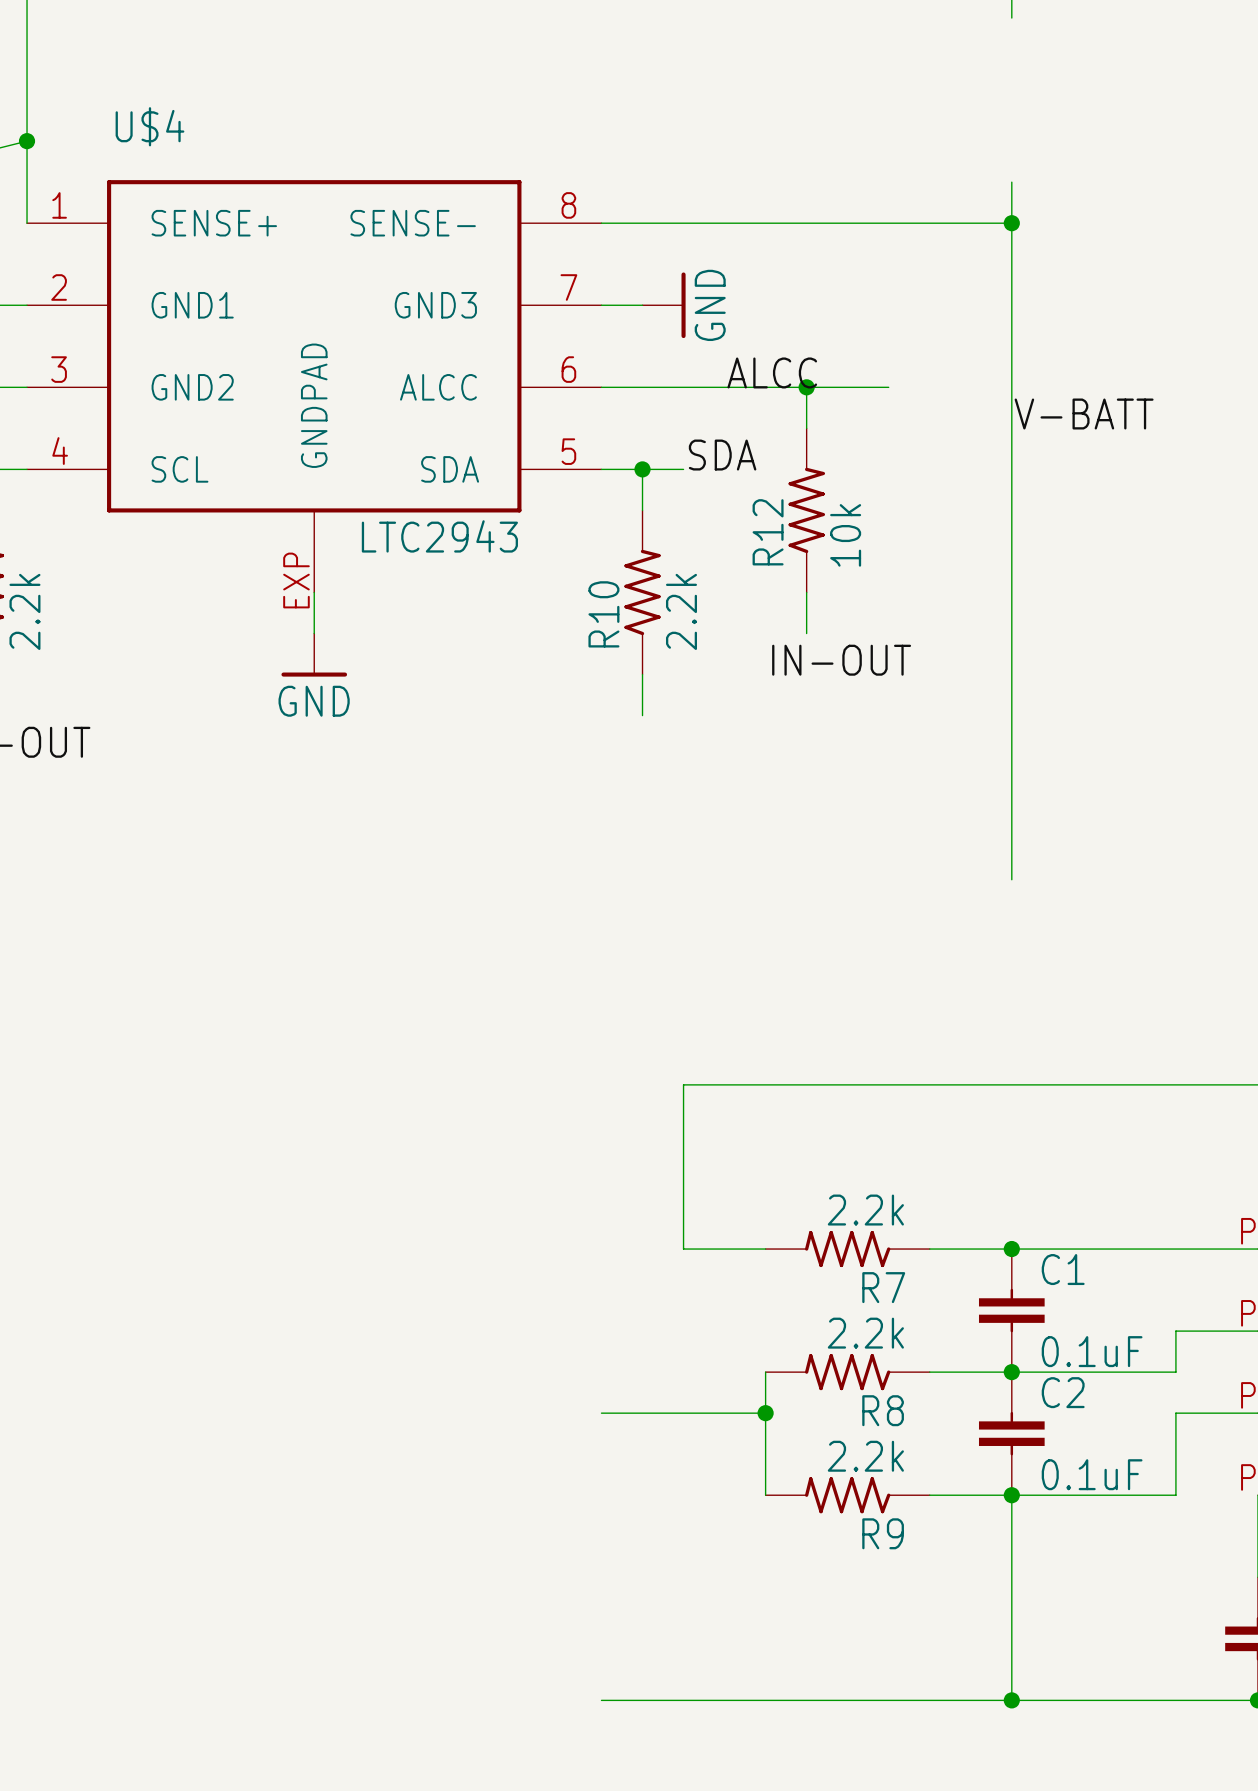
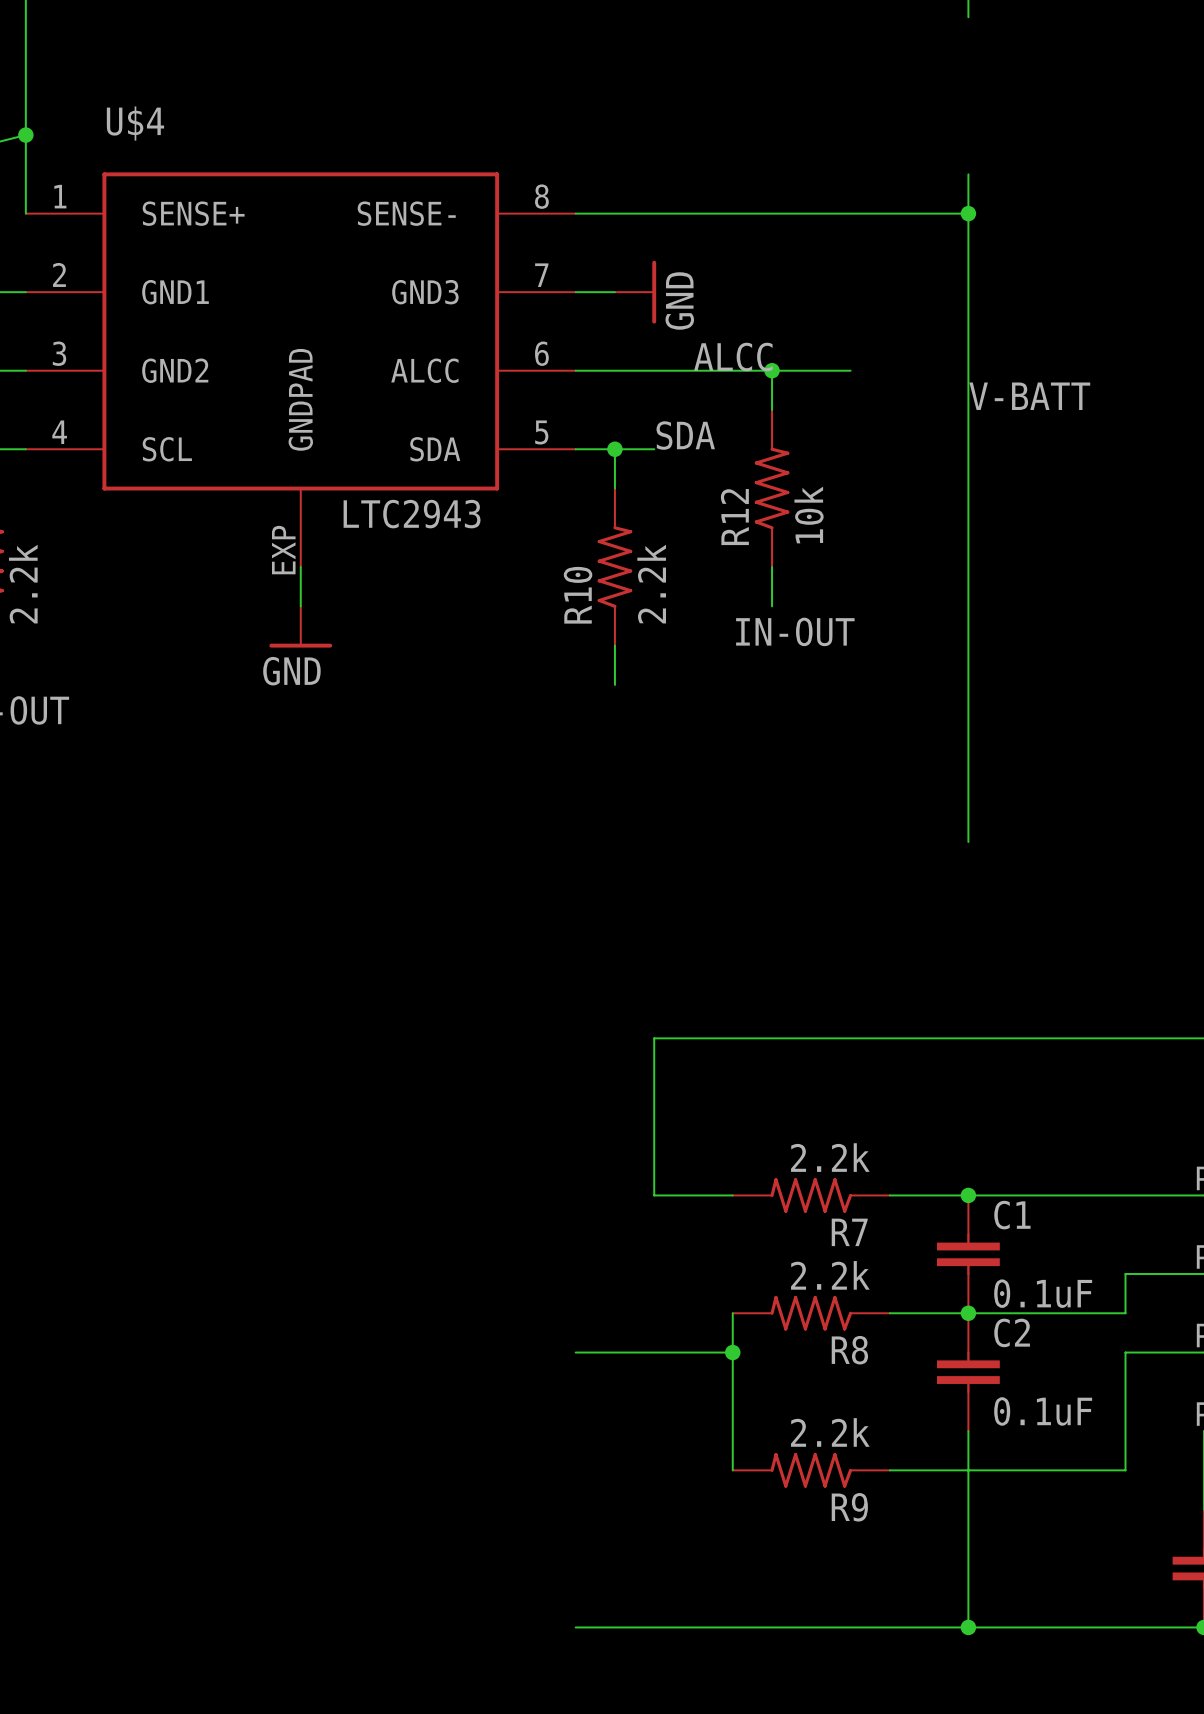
wire: none -> (732, 1431) (732, 1470)
R9 position: (847, 1495) -> (811, 1470)
wire: (929, 1495) (1175, 1495) -> (889, 1470) (1125, 1470) (1125, 1431)
junction: (1011, 1495) -> none

